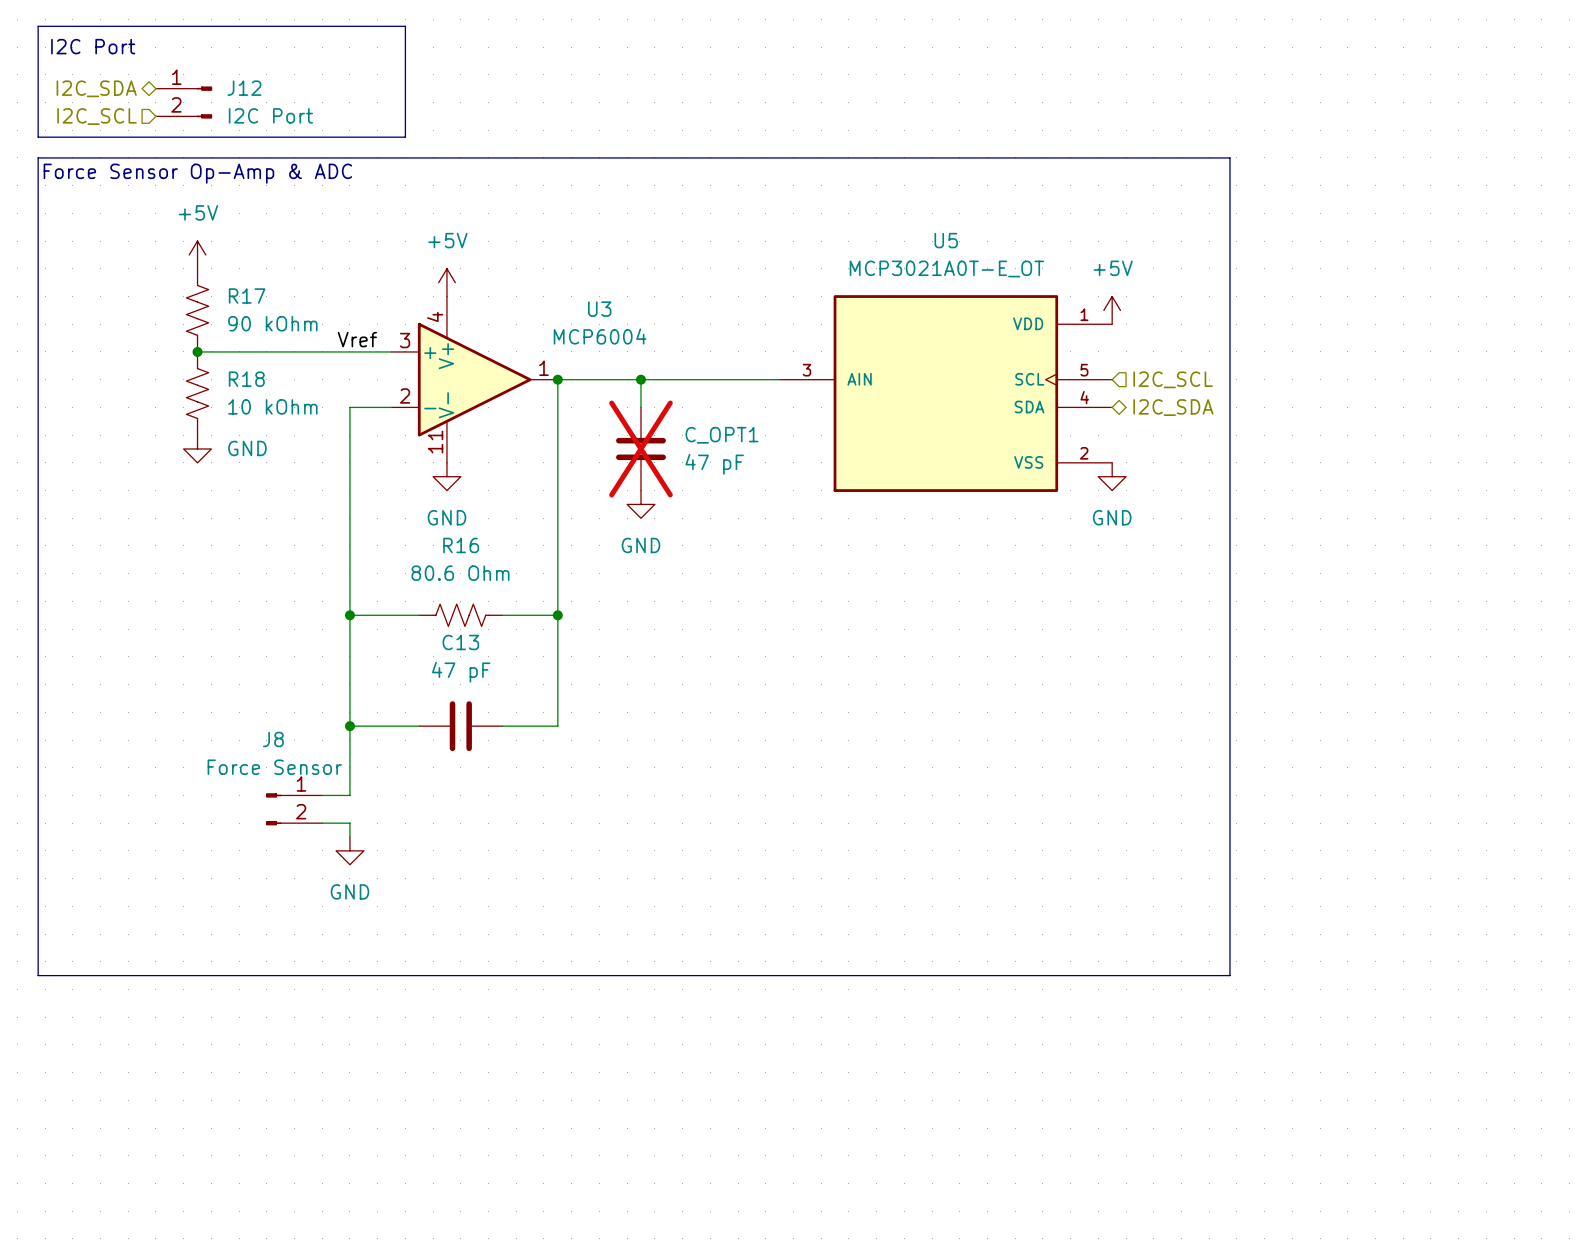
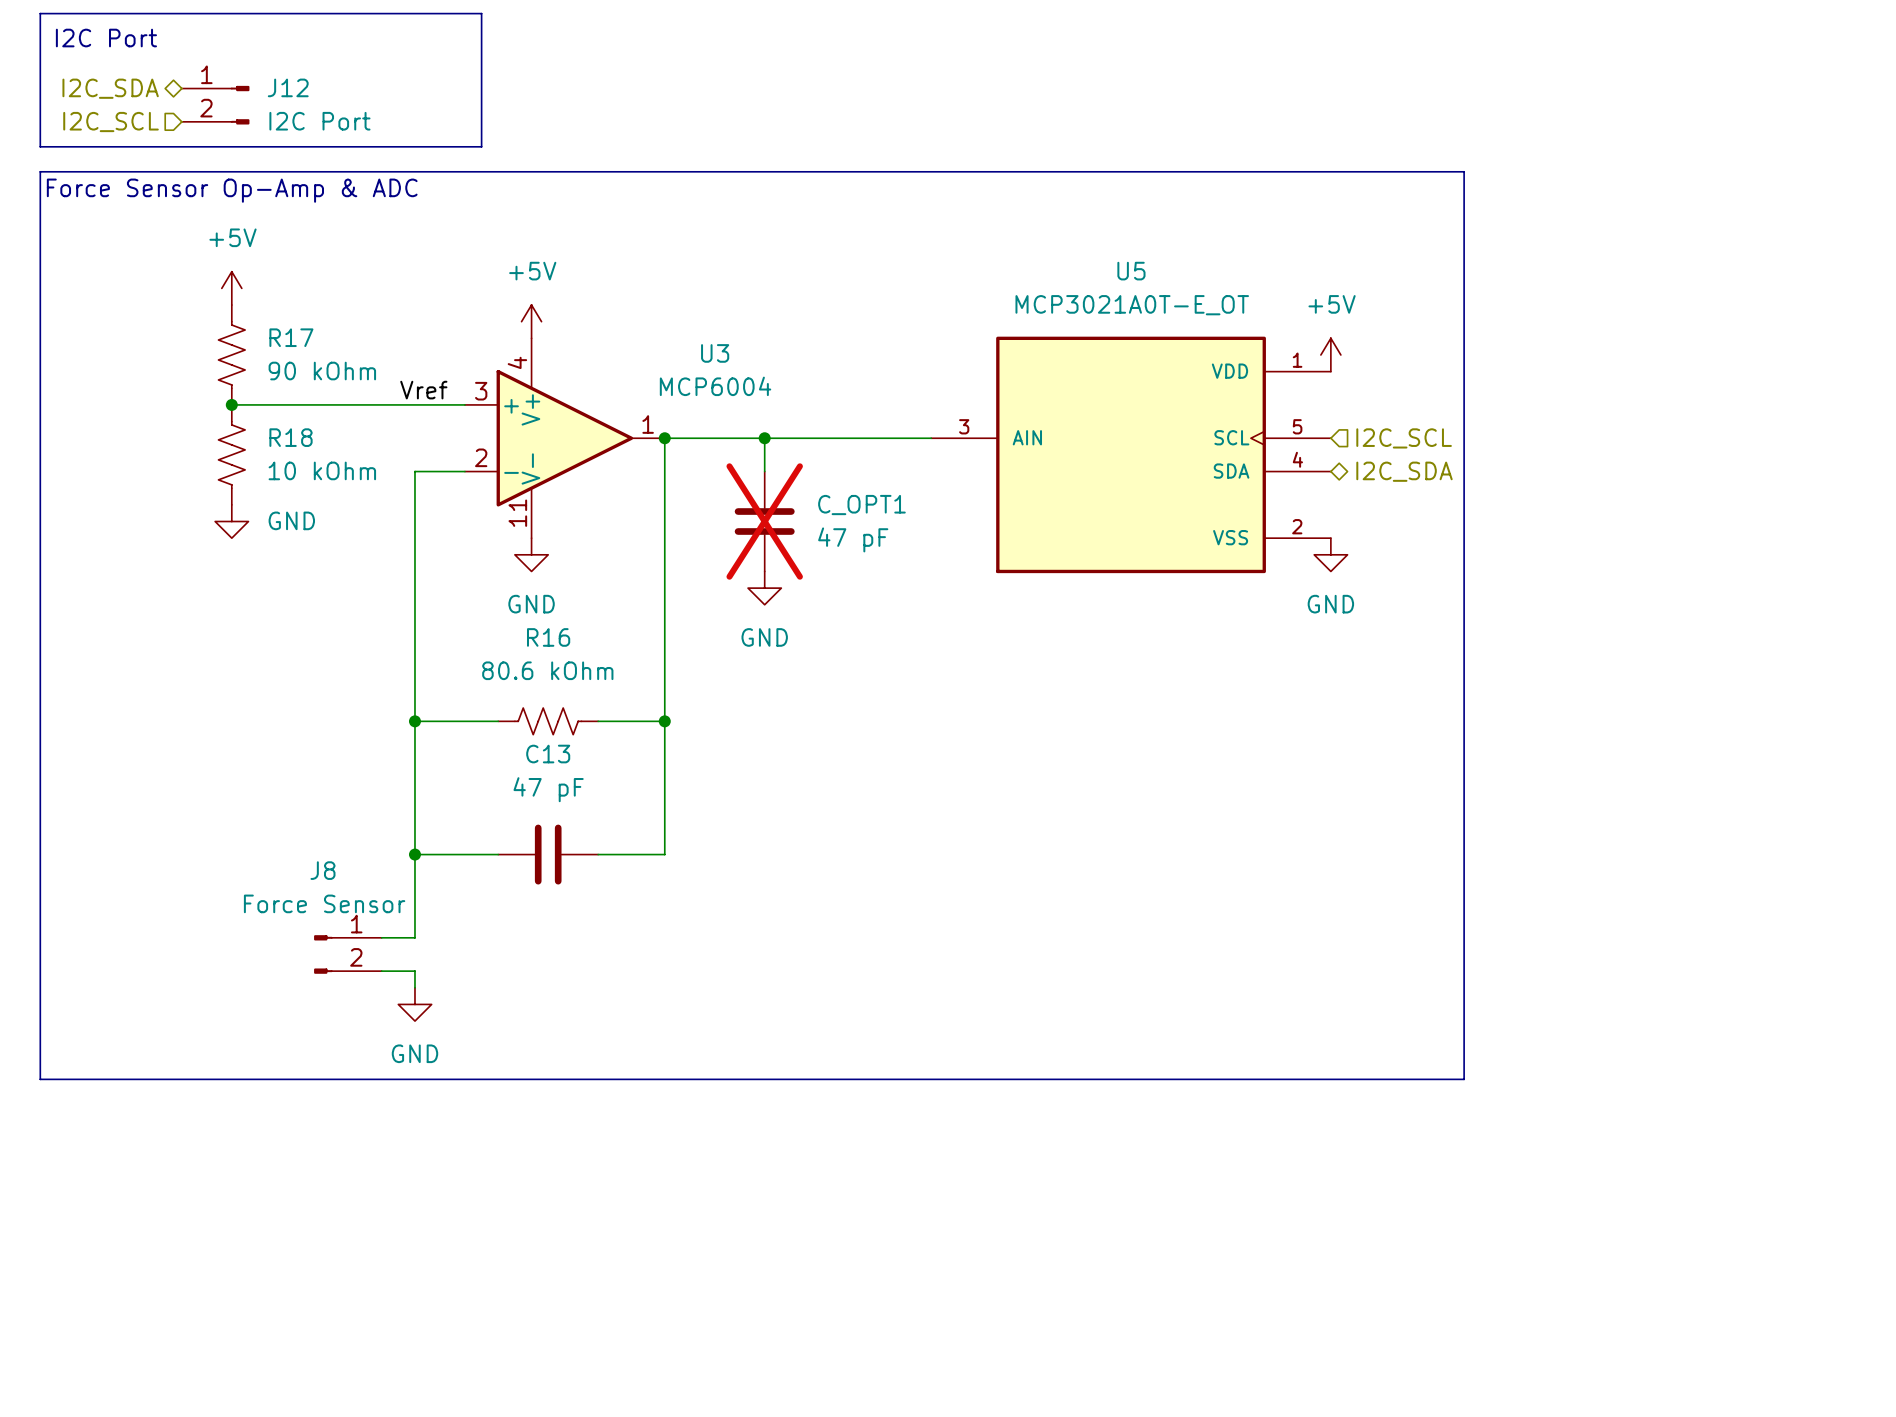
line: (1223, 157) (1229, 157) (1229, 975) (38, 975) (38, 913) -> (1464, 171) (1464, 1079) (40, 1079)
R16 value: 80.6 Ohm (460, 573) -> 80.6 kOhm (547, 670)

